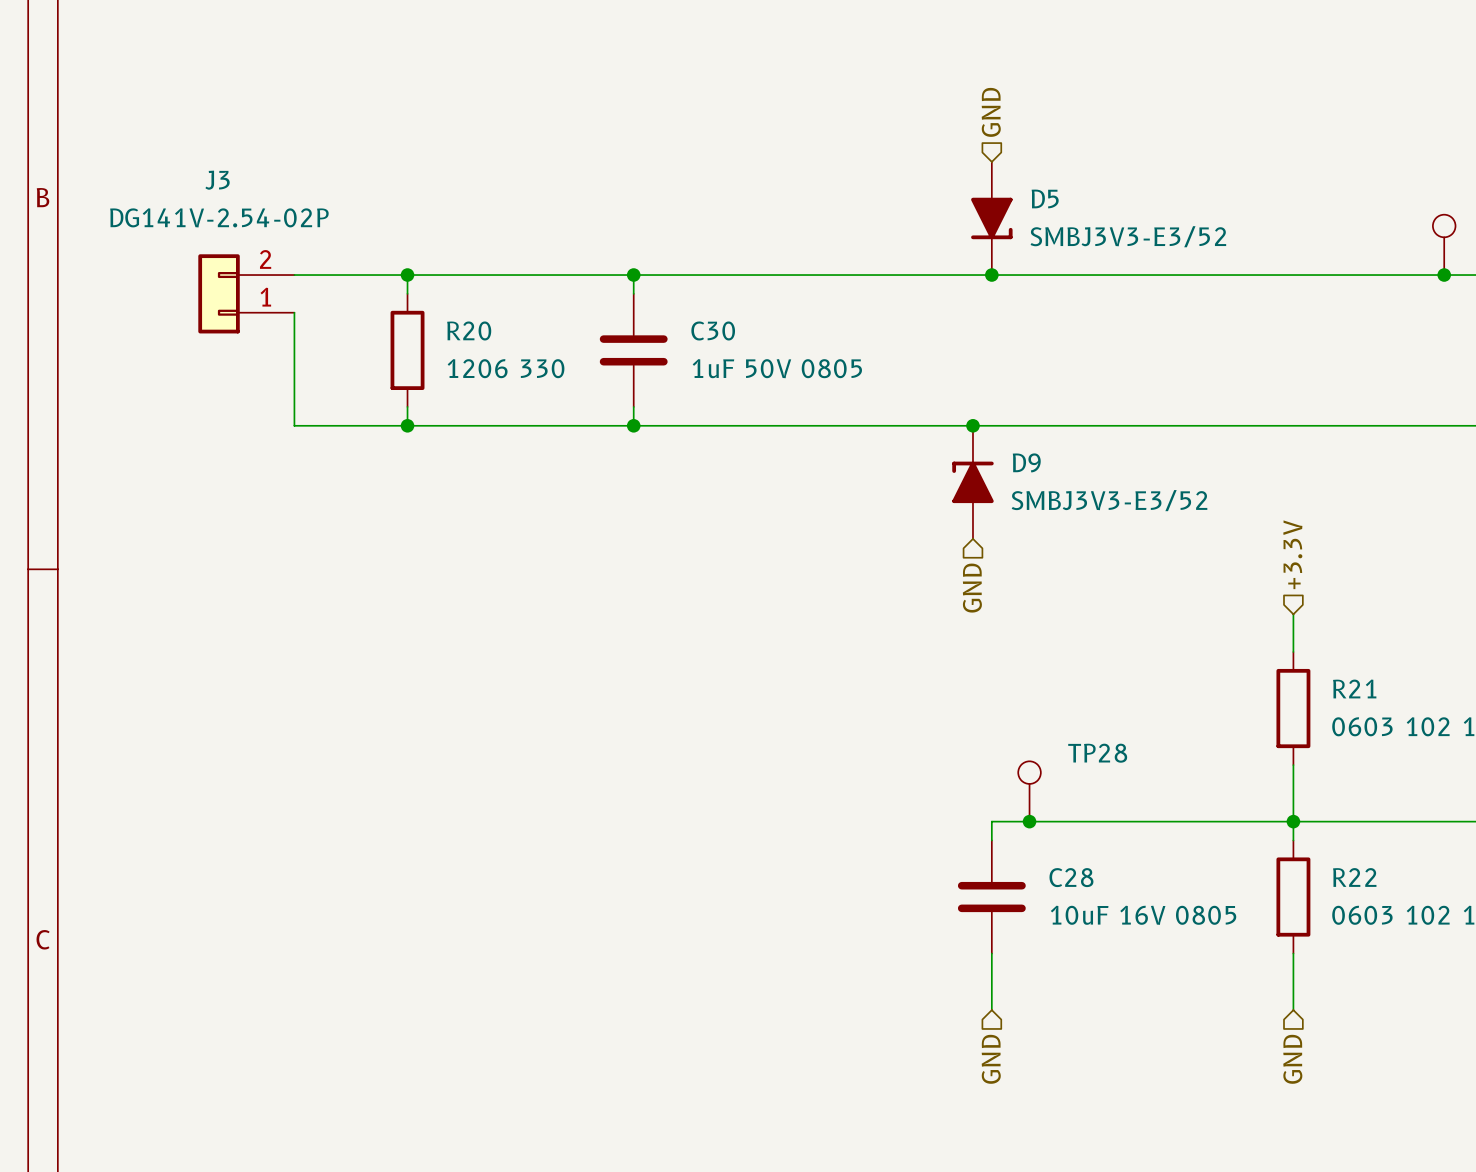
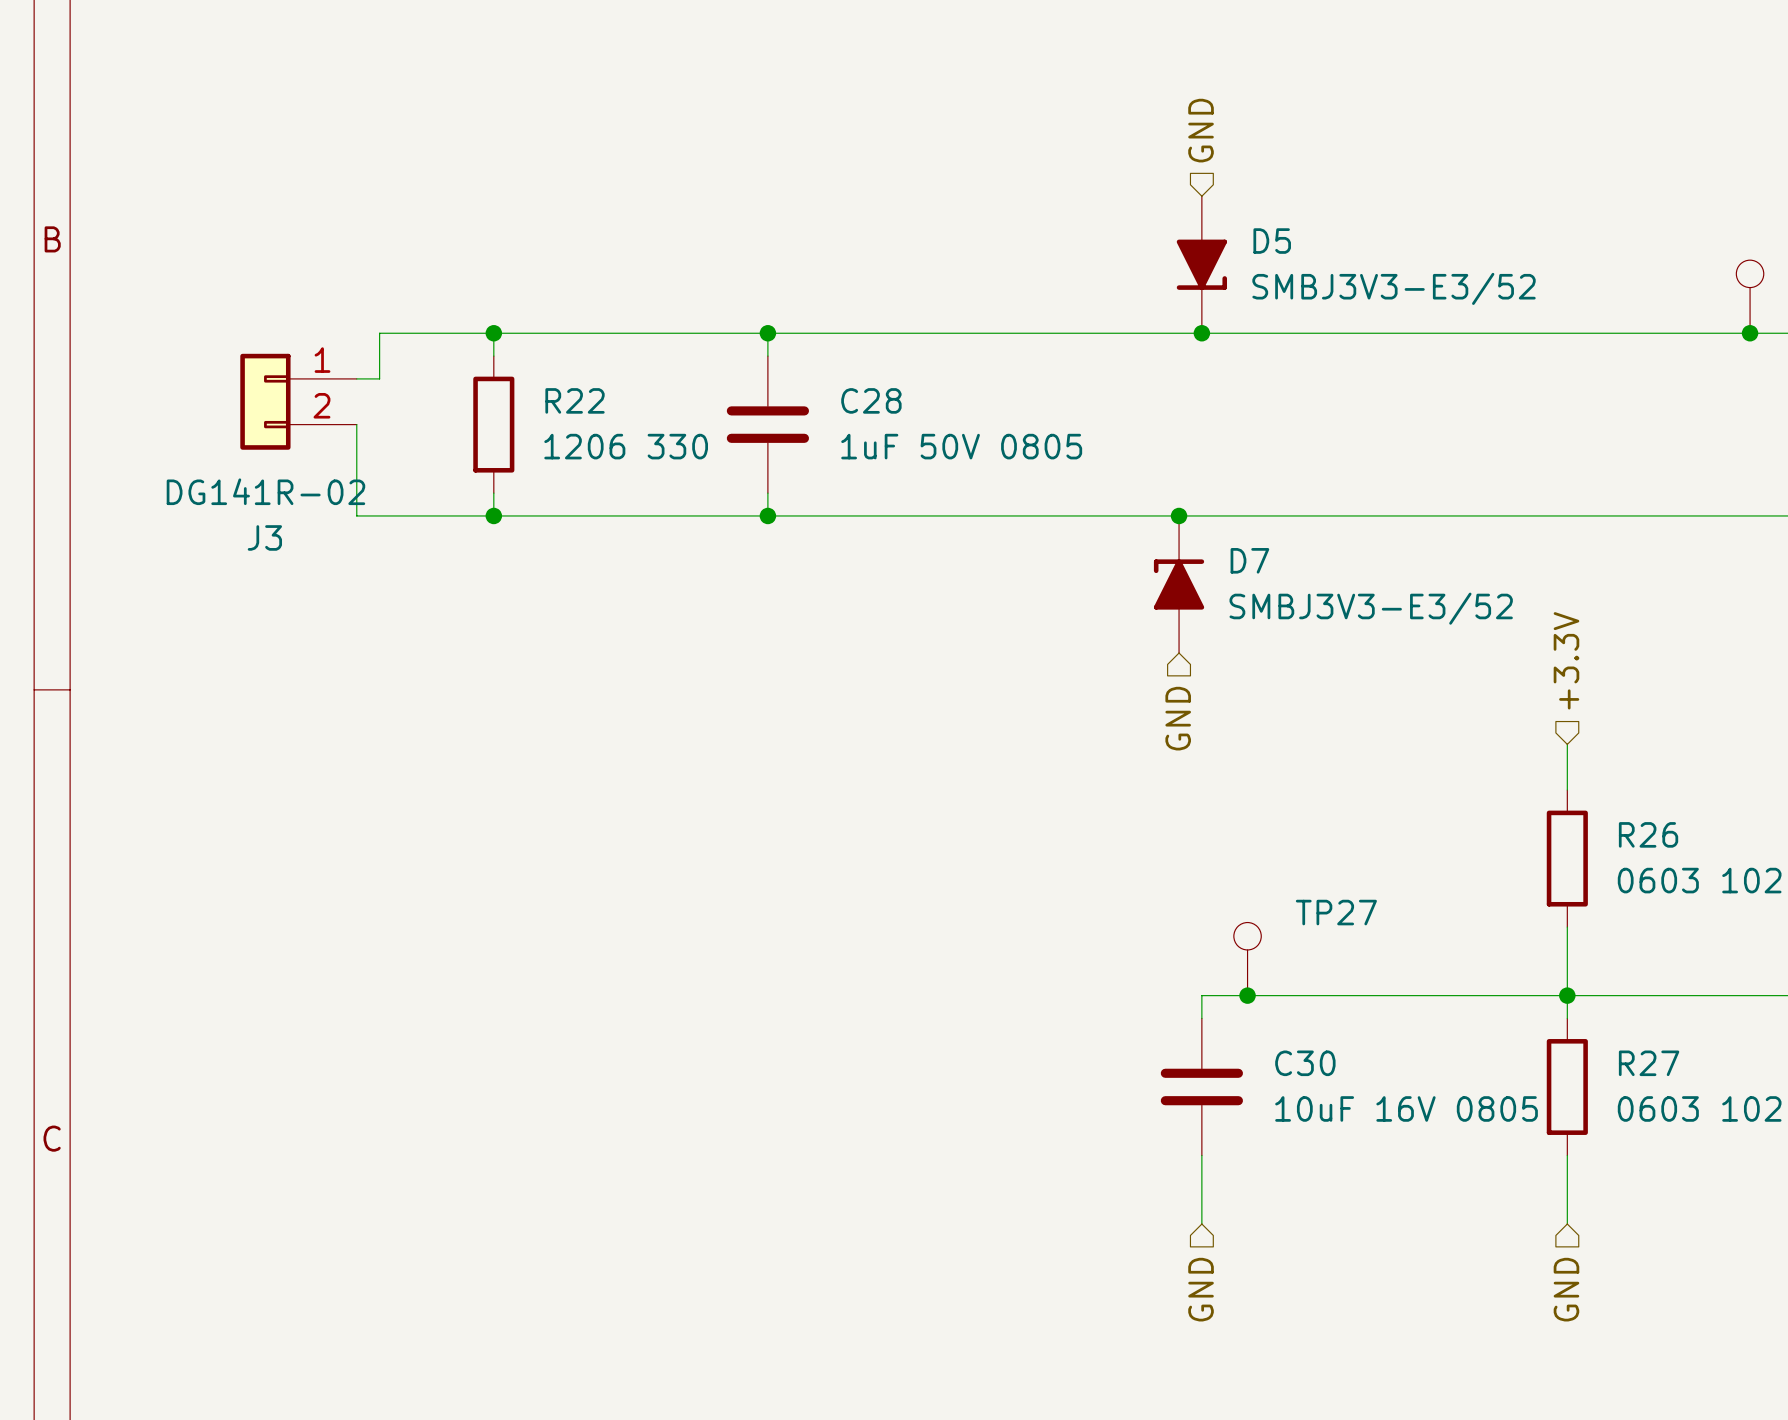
J3 value: DG141V-2.54-02P (219, 217) -> DG141R-02 (265, 491)
wire: (294, 275) (313, 275) -> (356, 378) (379, 378) (379, 333)
J3 flip: as is (219, 293) -> up-down (265, 401)
wire: (294, 312) (294, 350) -> none
R20 name: R20 (469, 330) -> R22 (575, 400)
C30 name: C30 (713, 330) -> C28 (871, 400)
D9 name: D9 (1026, 462) -> D7 (1249, 560)
R21 name: R21 (1354, 688) -> R26 (1648, 834)
TP28 name: TP28 (1097, 753) -> TP27 (1336, 912)
C28 name: C28 (1071, 877) -> C30 (1305, 1063)
R22 name: R22 (1354, 877) -> R27 (1649, 1063)

